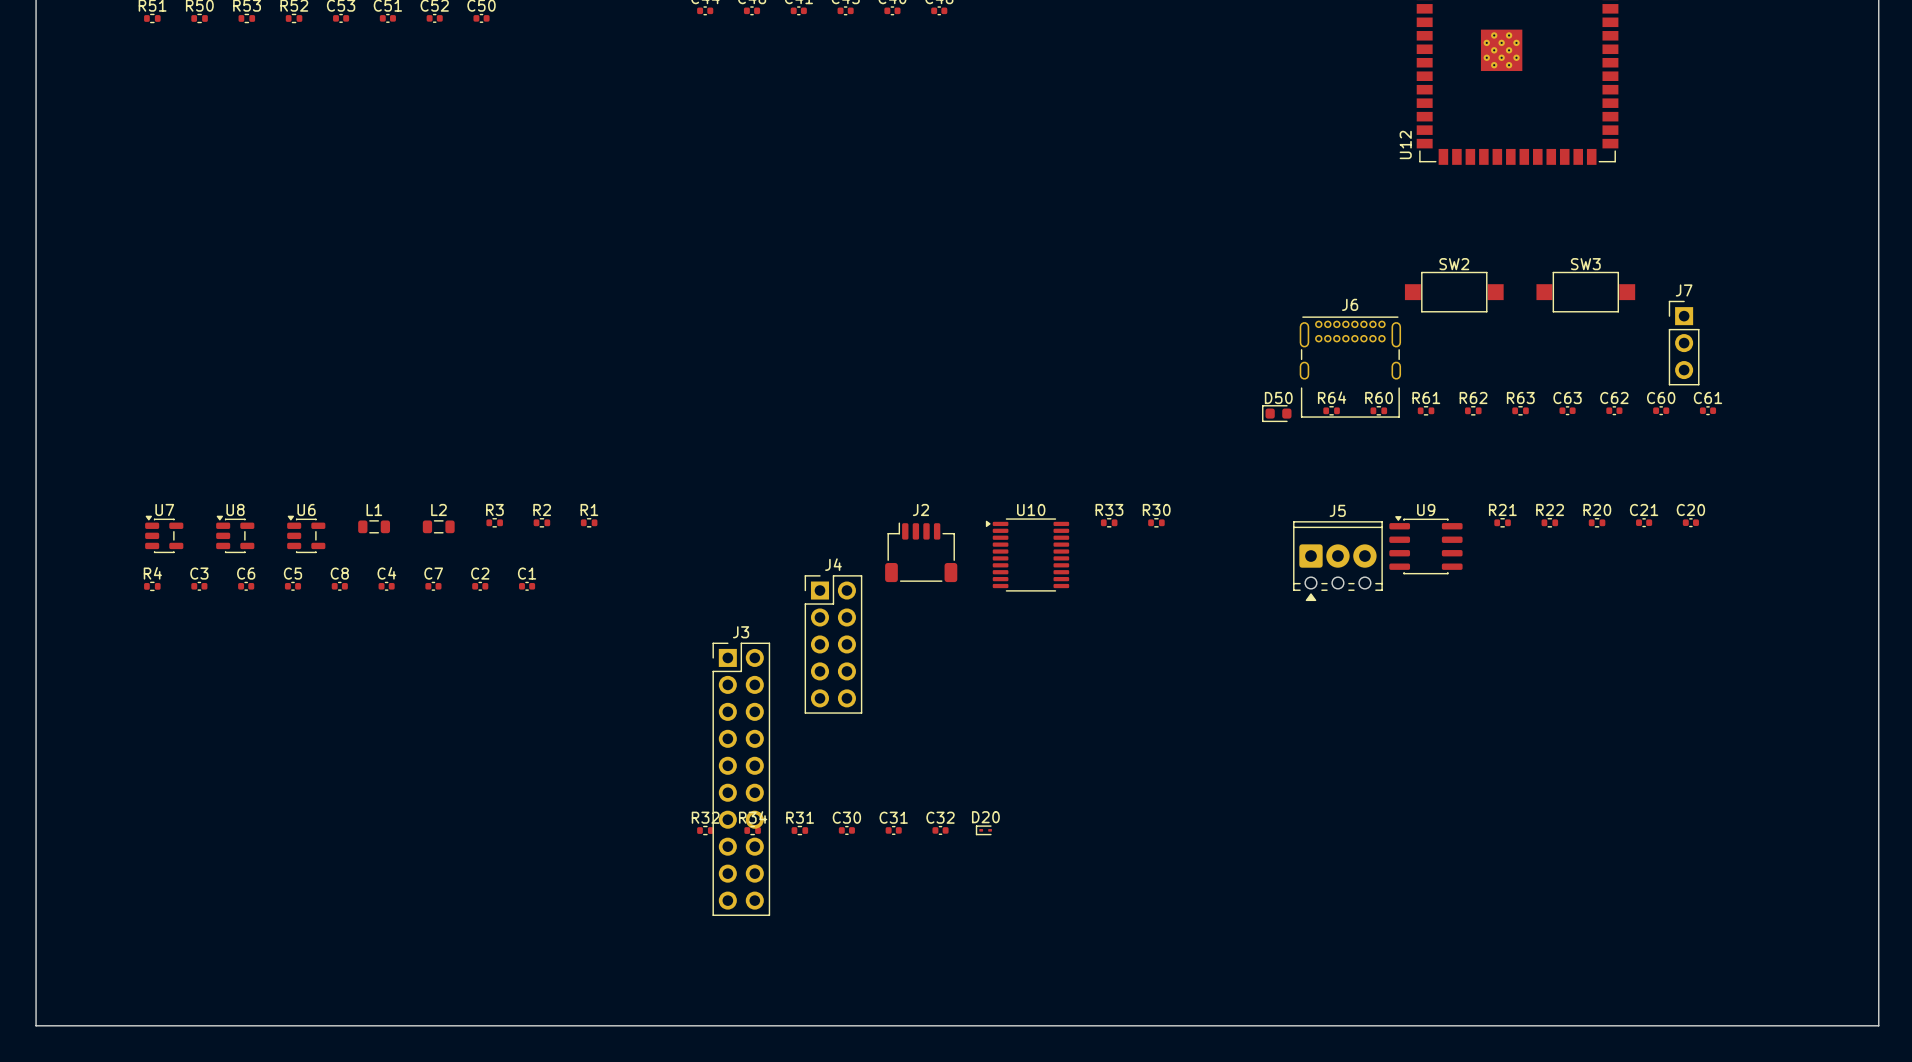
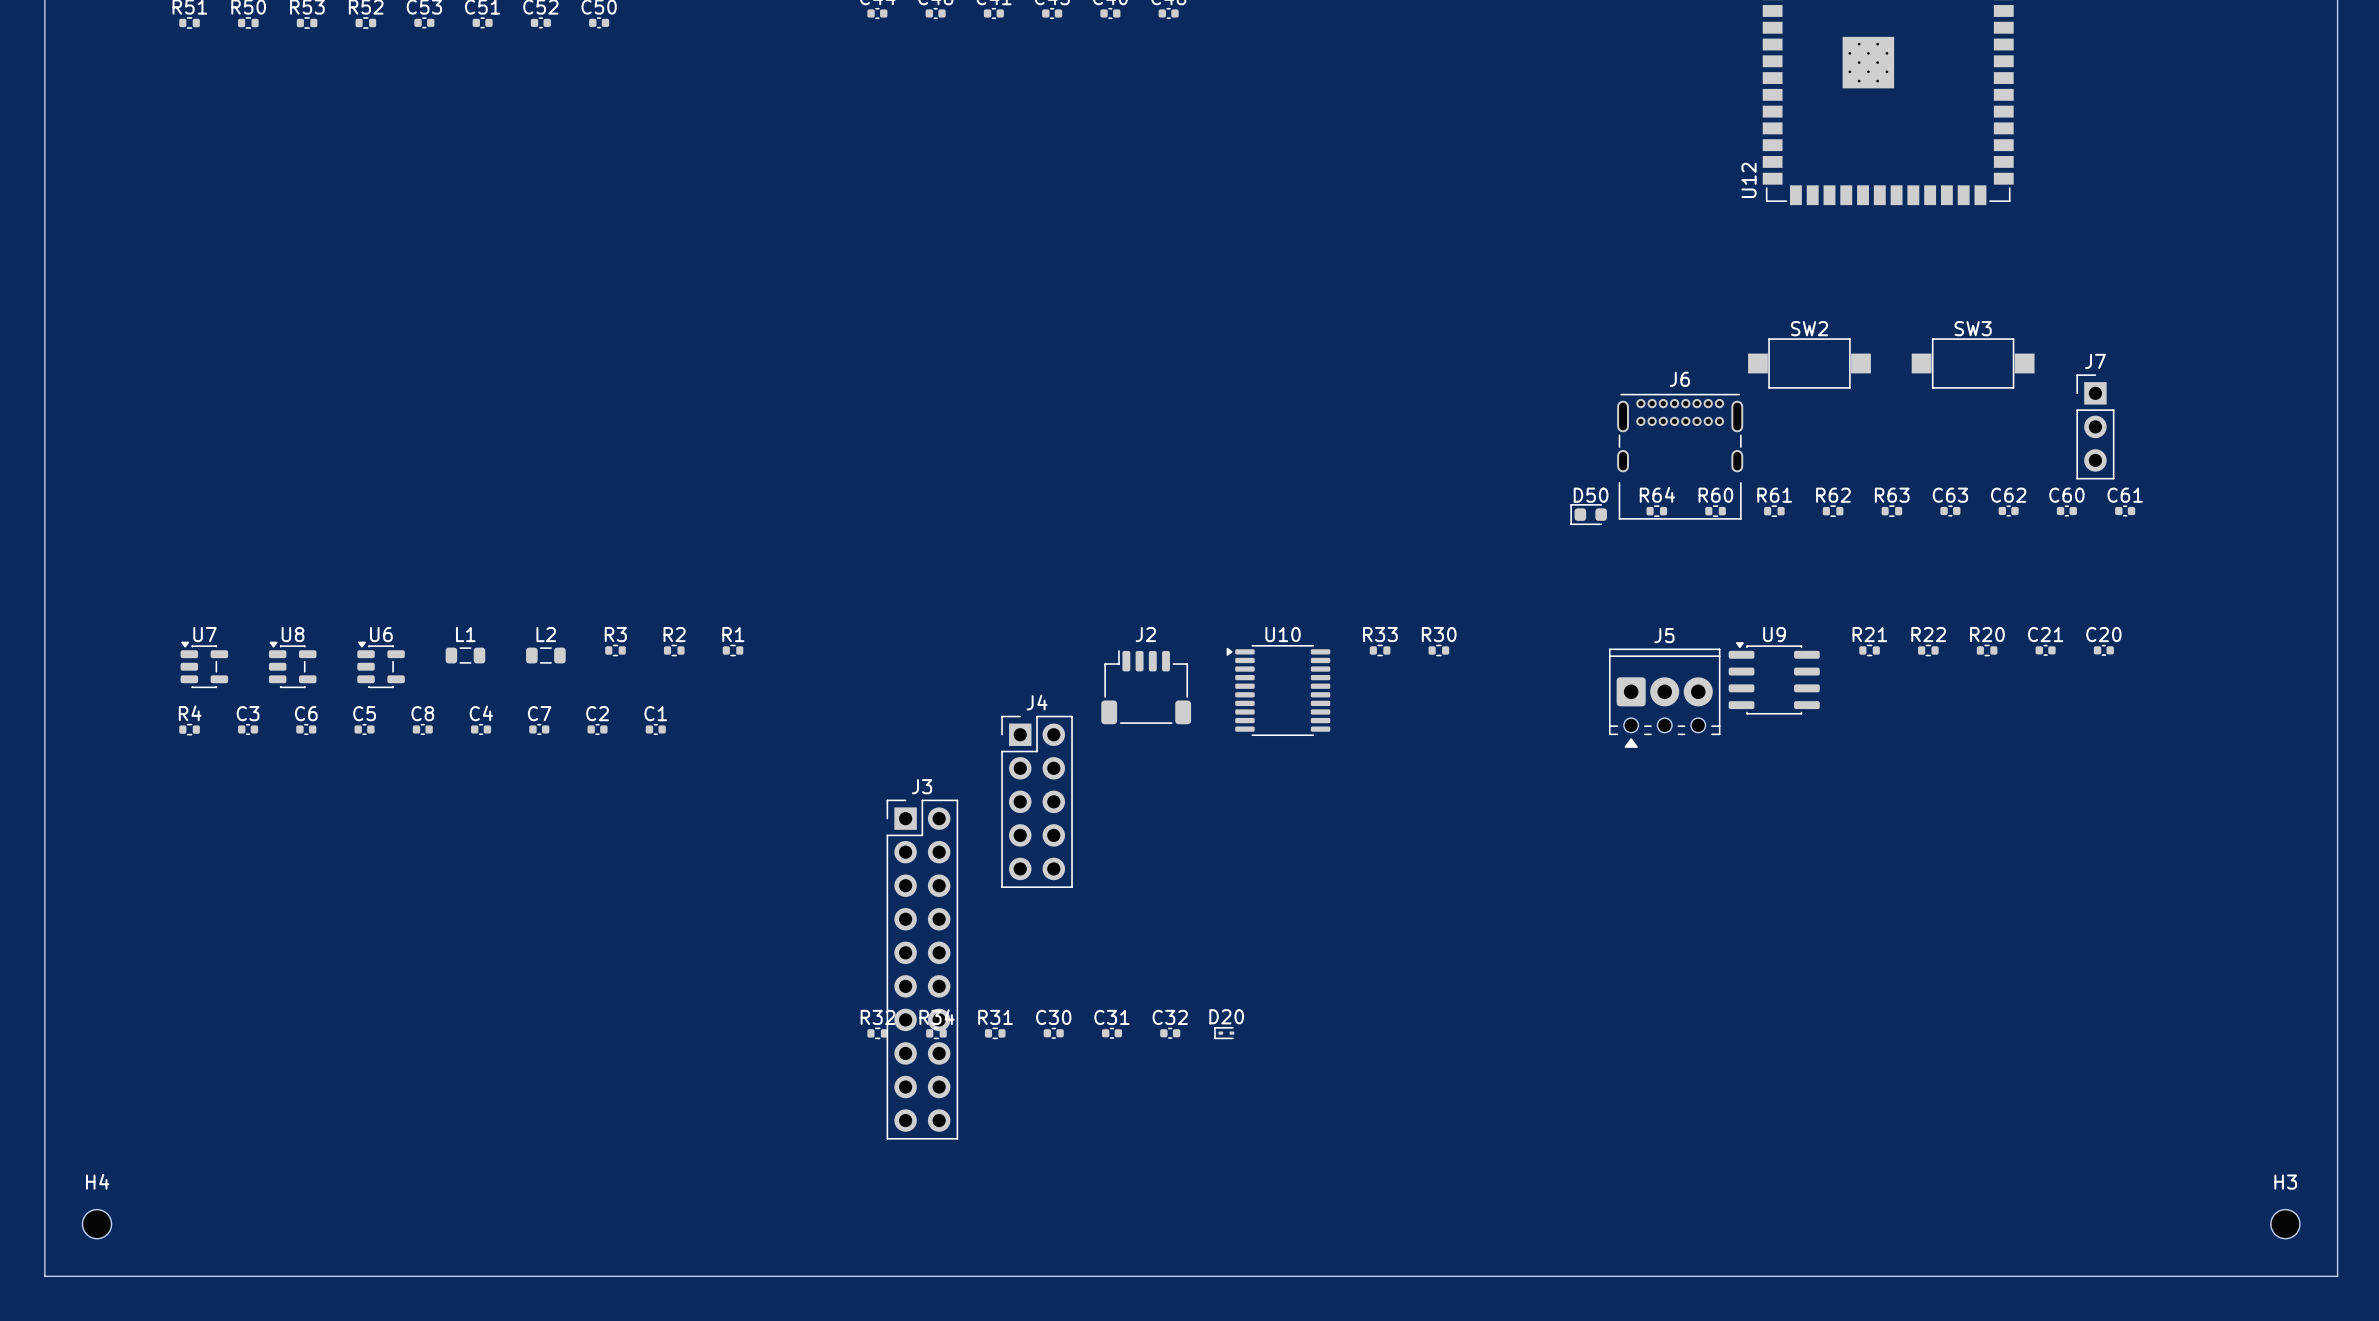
H4: none -> (97, 1224)
H3: none -> (2285, 1224)

